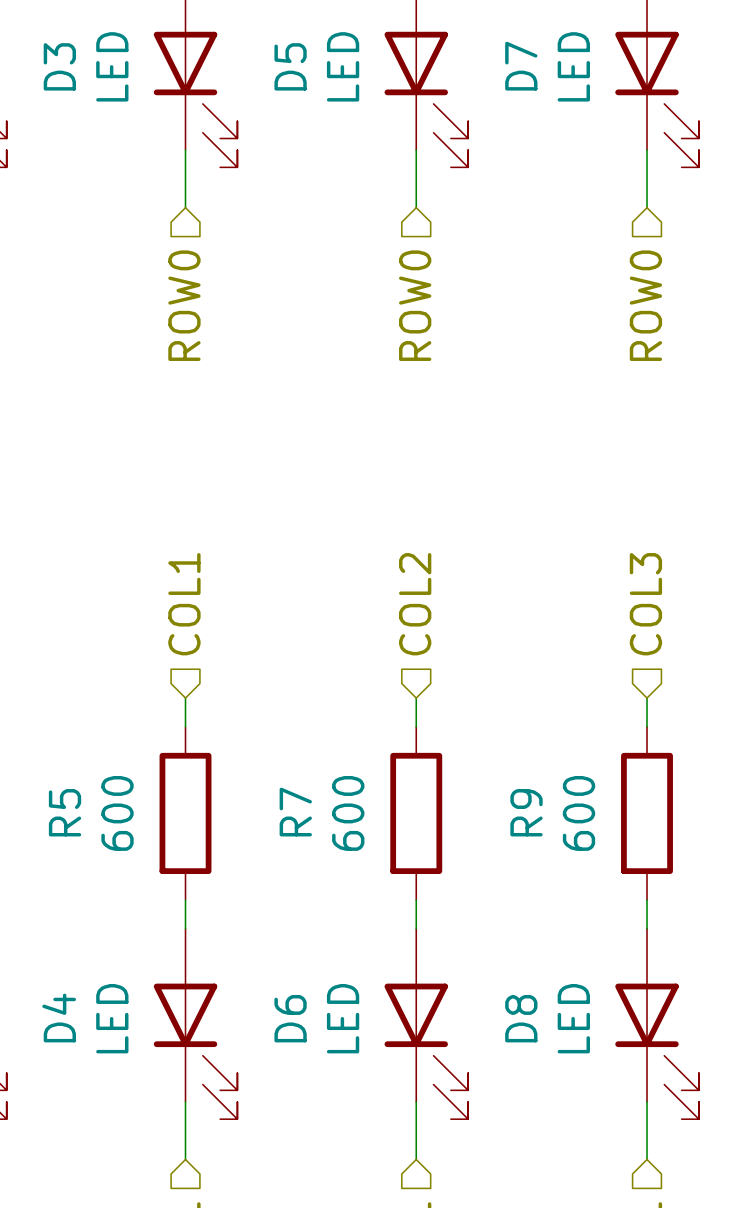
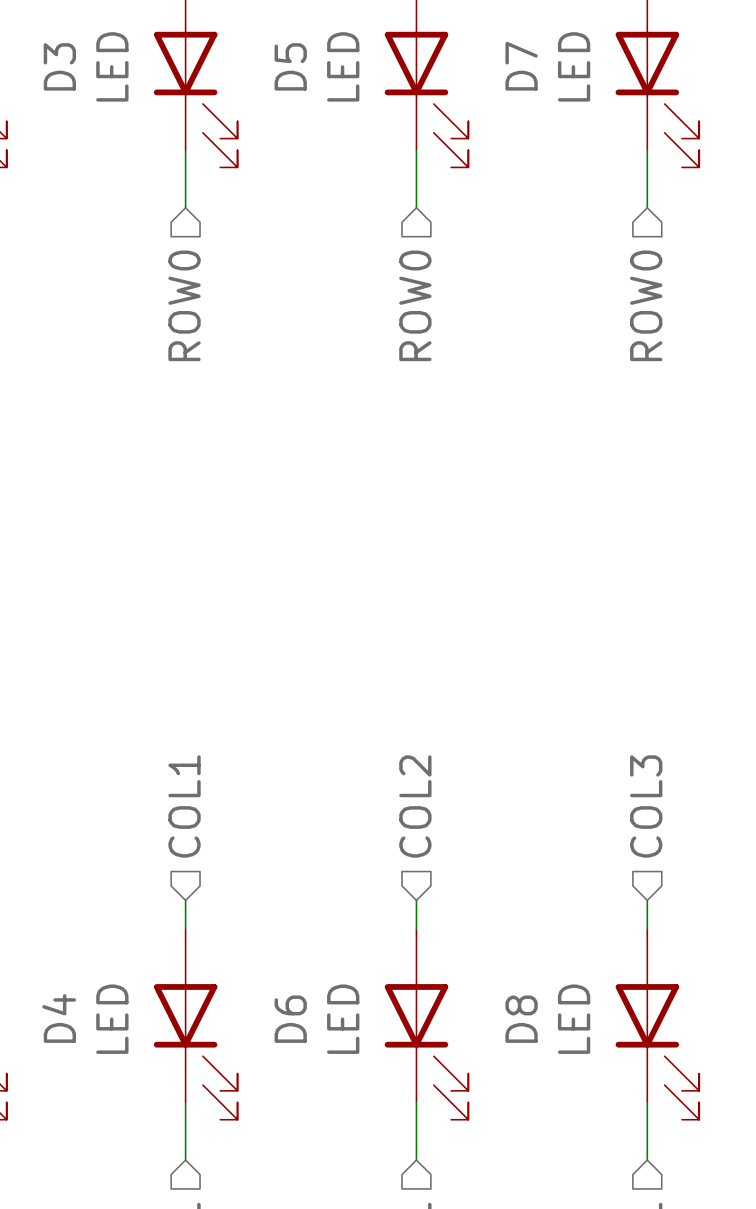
hierarchical label position: COL1 (184, 604) -> COL1 (184, 806)
hierarchical label position: COL2 (415, 604) -> COL2 (415, 806)
hierarchical label position: COL3 (645, 604) -> COL3 (646, 806)
wire: (185, 698) (185, 726) -> none
wire: (416, 698) (416, 726) -> none
wire: (647, 698) (647, 726) -> none
R5: 600 (185, 813) -> none
R7: 600 (416, 813) -> none
R9: 600 (647, 813) -> none

